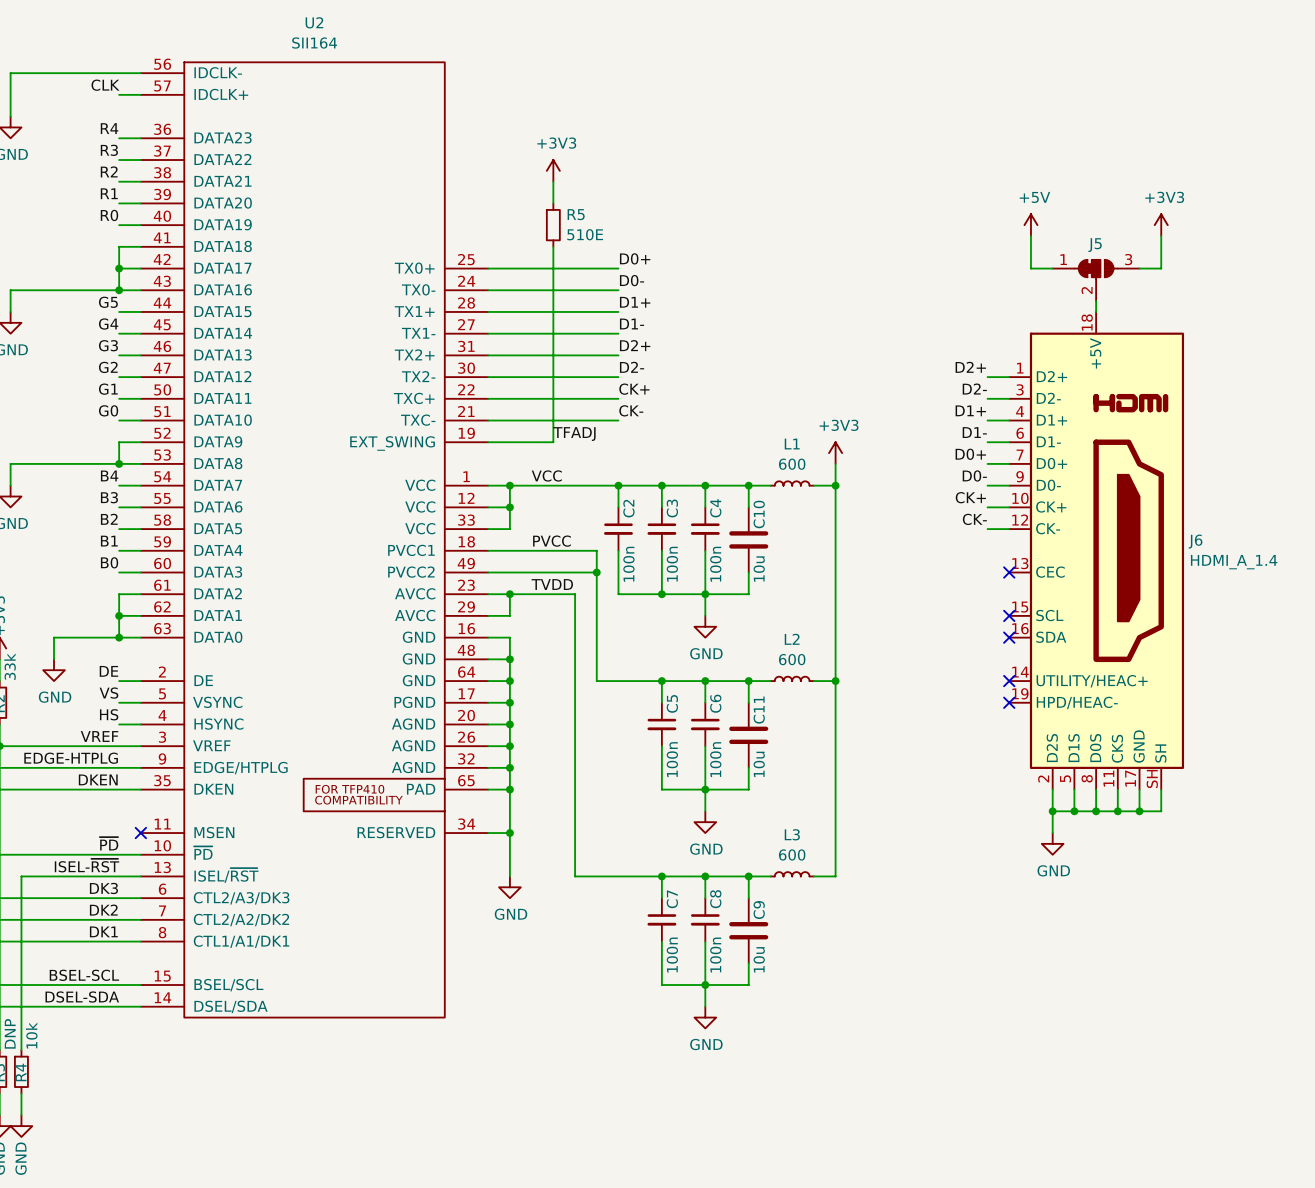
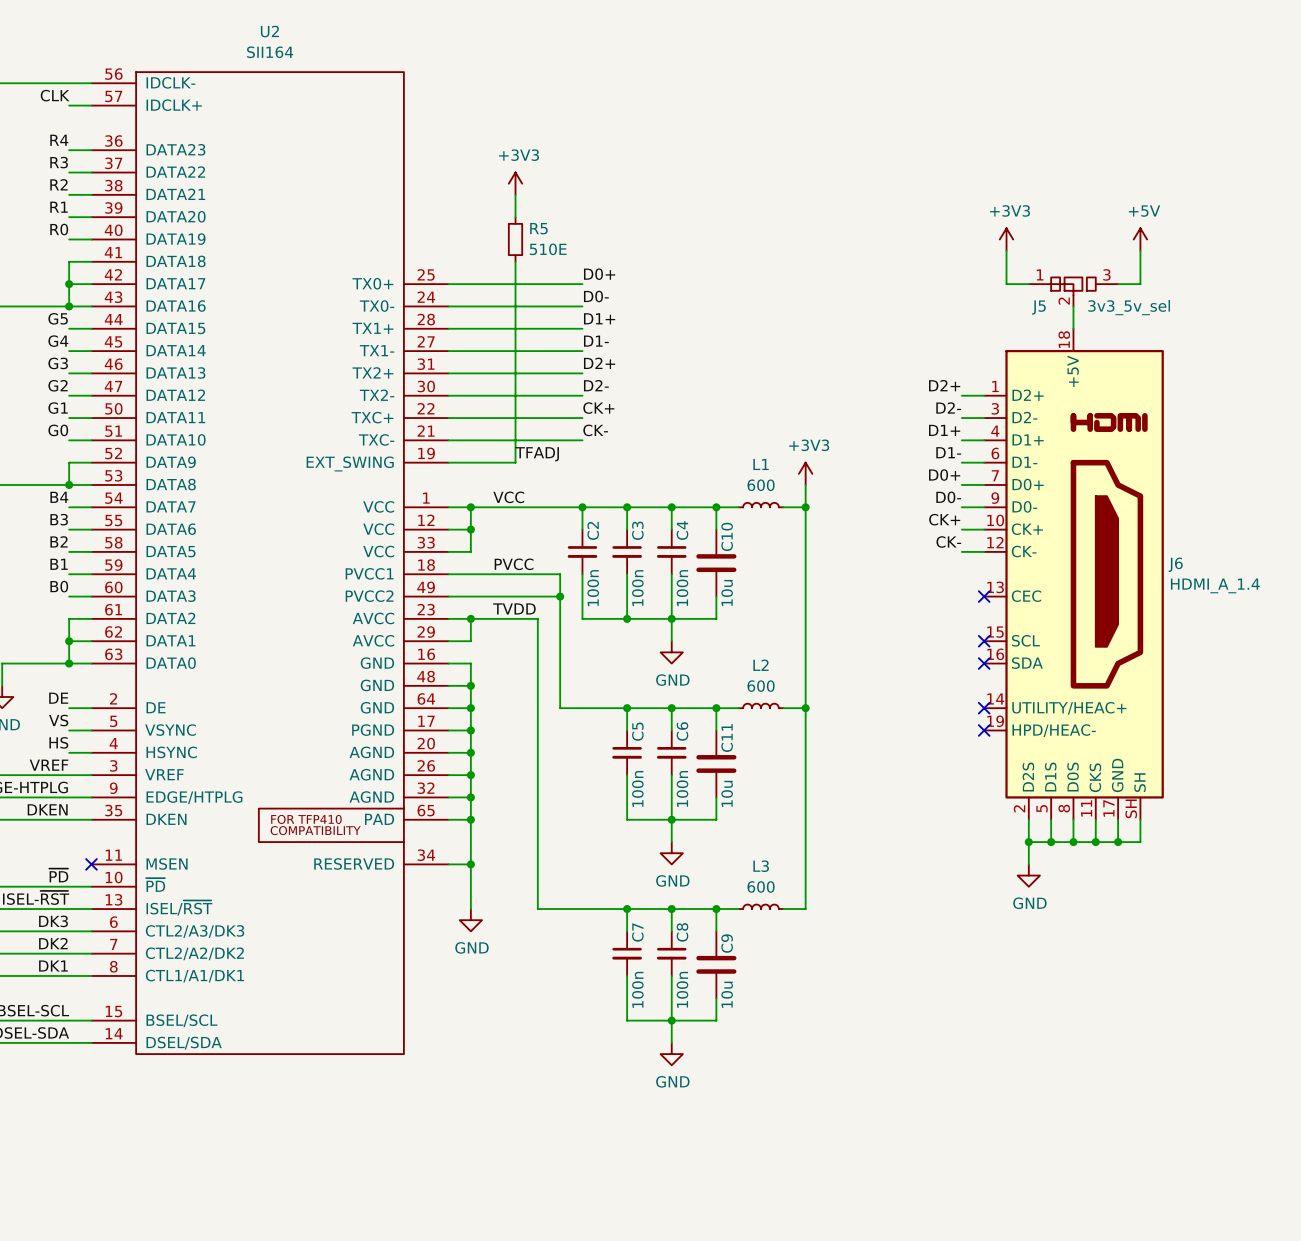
power symbol: +5V (1030, 225) -> +3V3 (1006, 239)
power symbol: +3V3 (1161, 225) -> +5V (1140, 239)
J5 name position: J5 (1095, 245) -> J5 (1038, 307)
J5 symbol: [1052, 259, 1140, 302] -> [1028, 277, 1119, 307]
J5 value: none -> 3v3_5v_sel (1129, 307)

